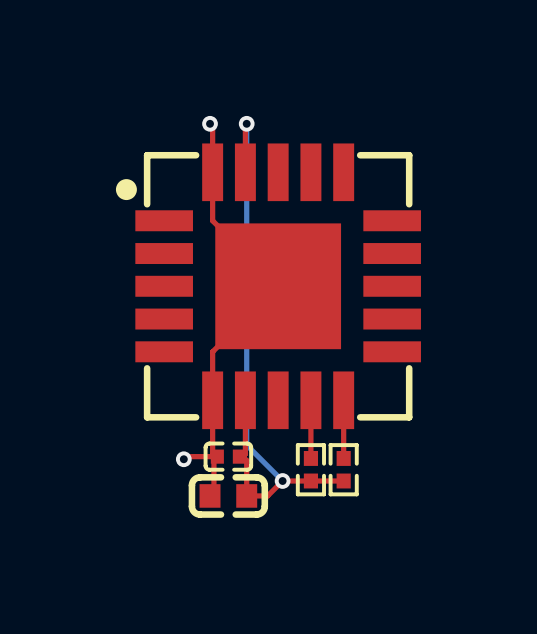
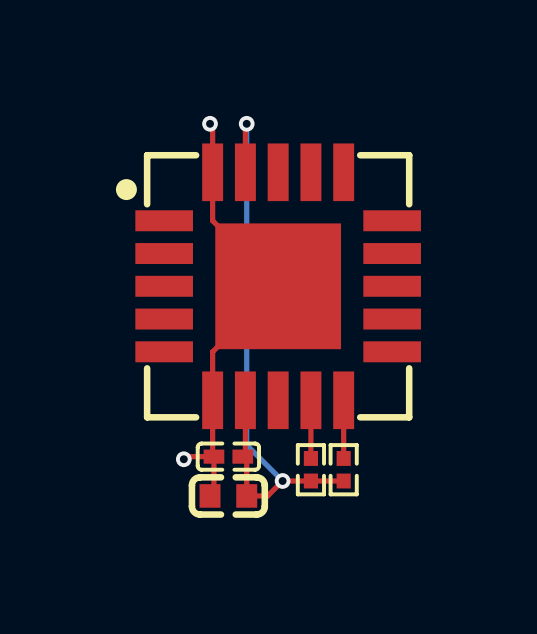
part footprint: [203, 441, 254, 472] -> [195, 441, 261, 472]

